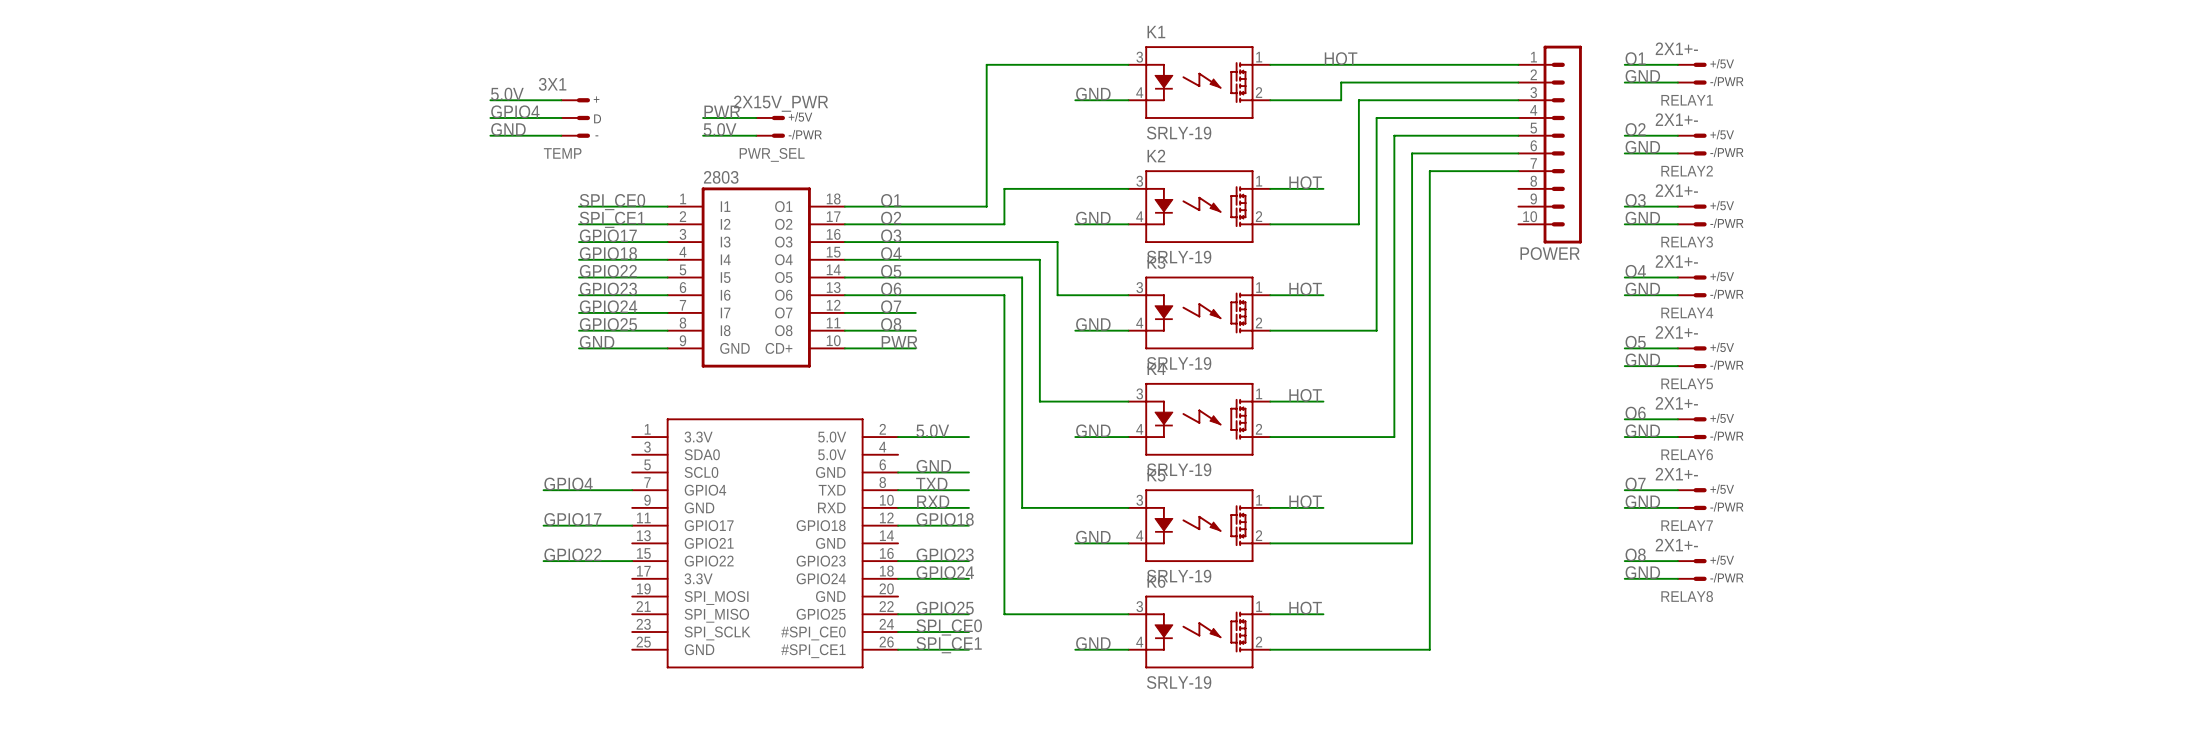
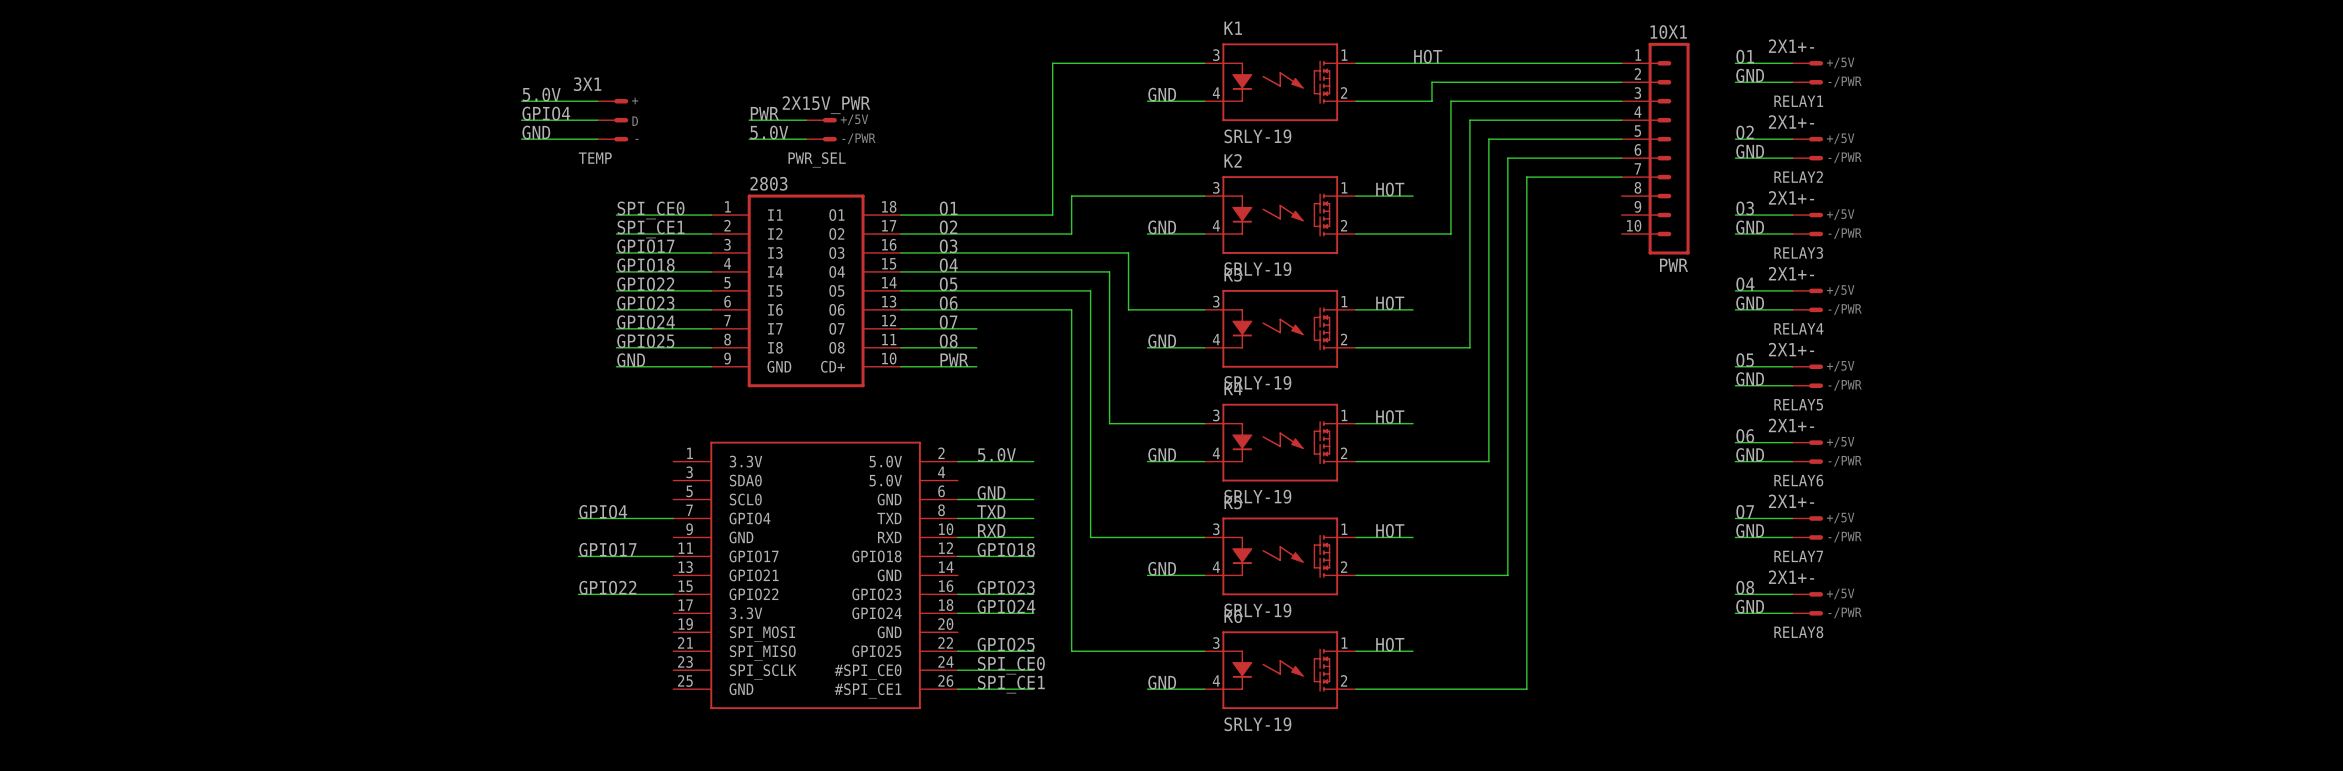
POWER value: none -> 10X1 (1668, 32)
POWER name: POWER (1550, 253) -> PWR (1674, 265)

